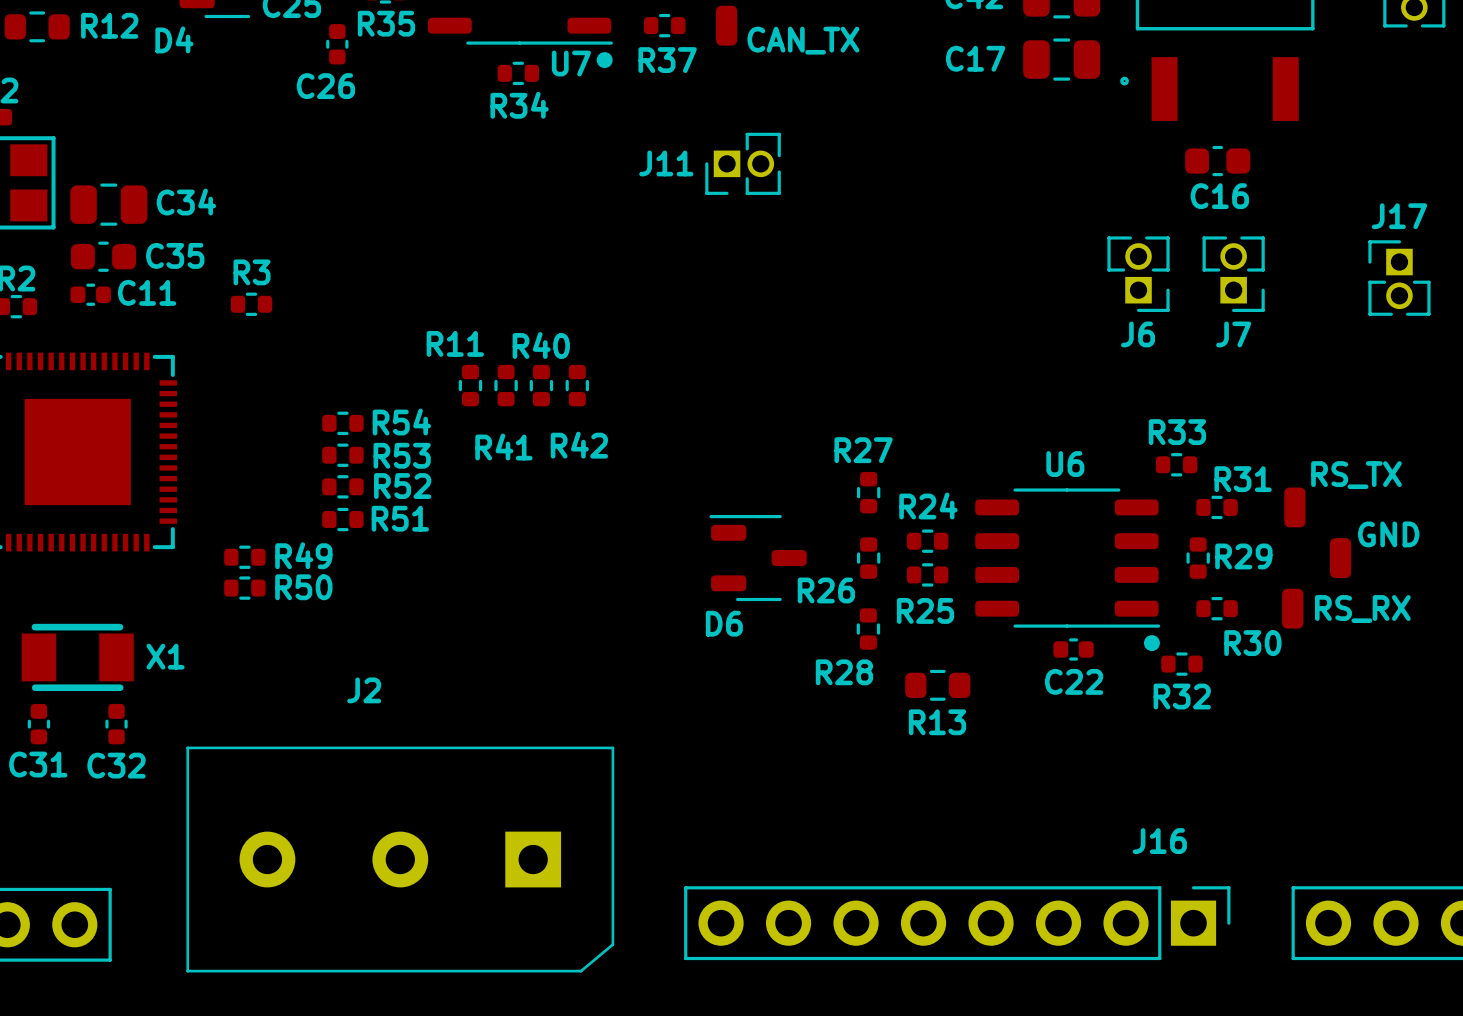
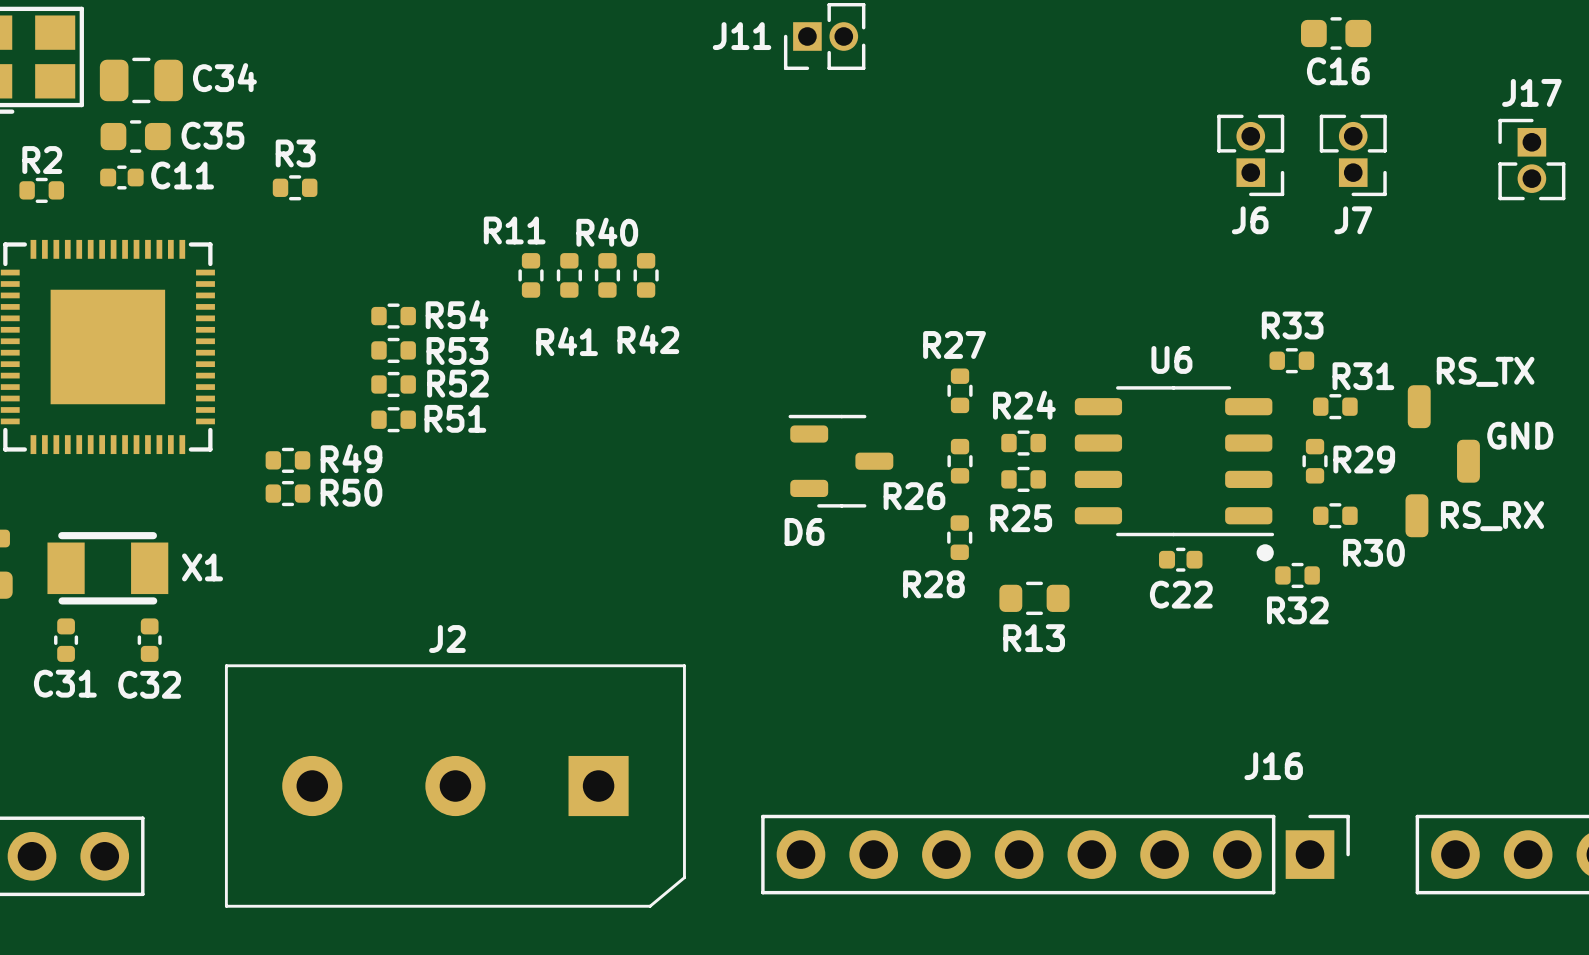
J2 name position: J2 (364, 690) -> J2 (447, 639)

